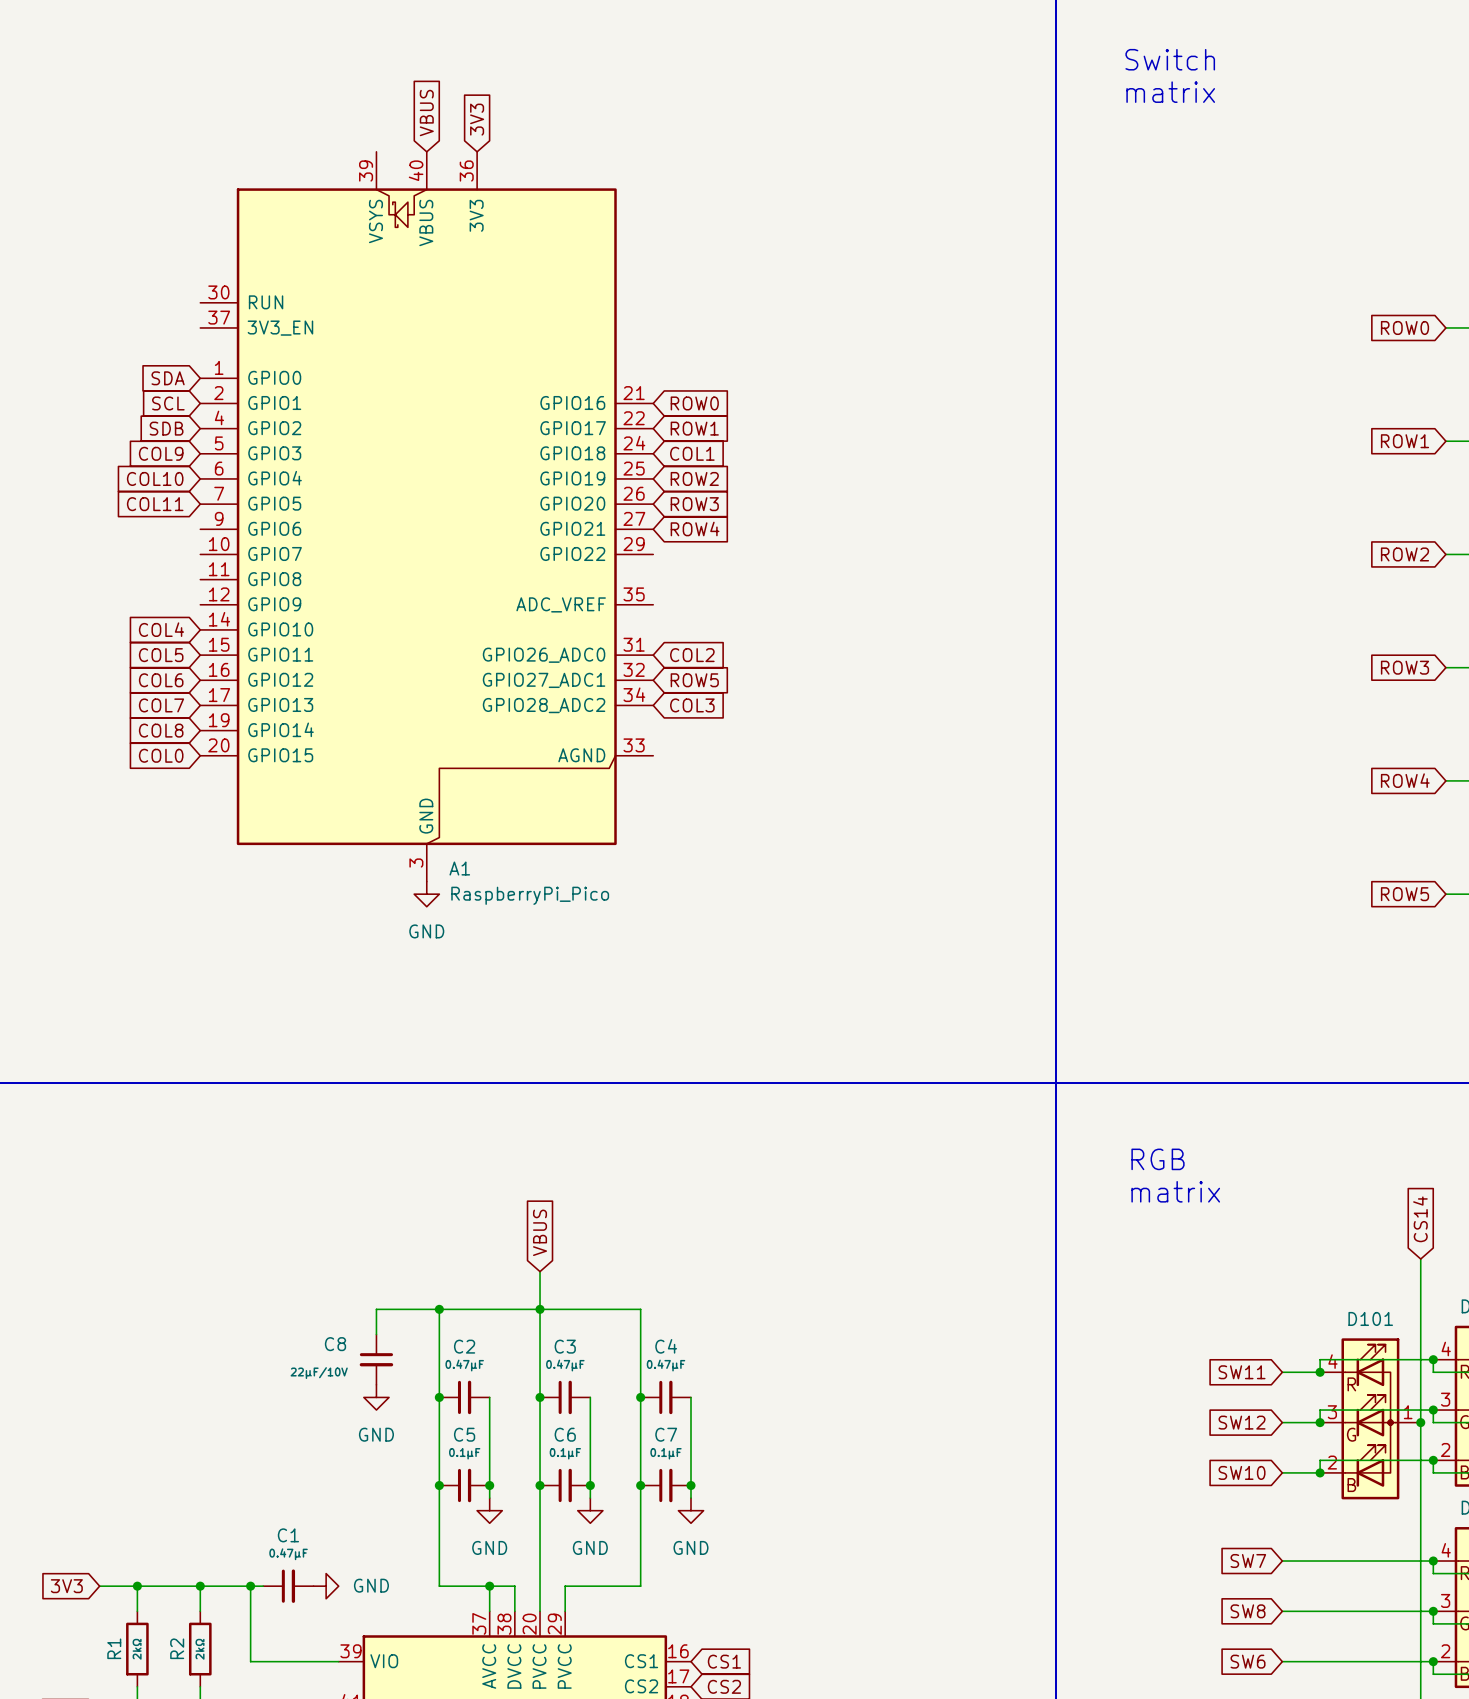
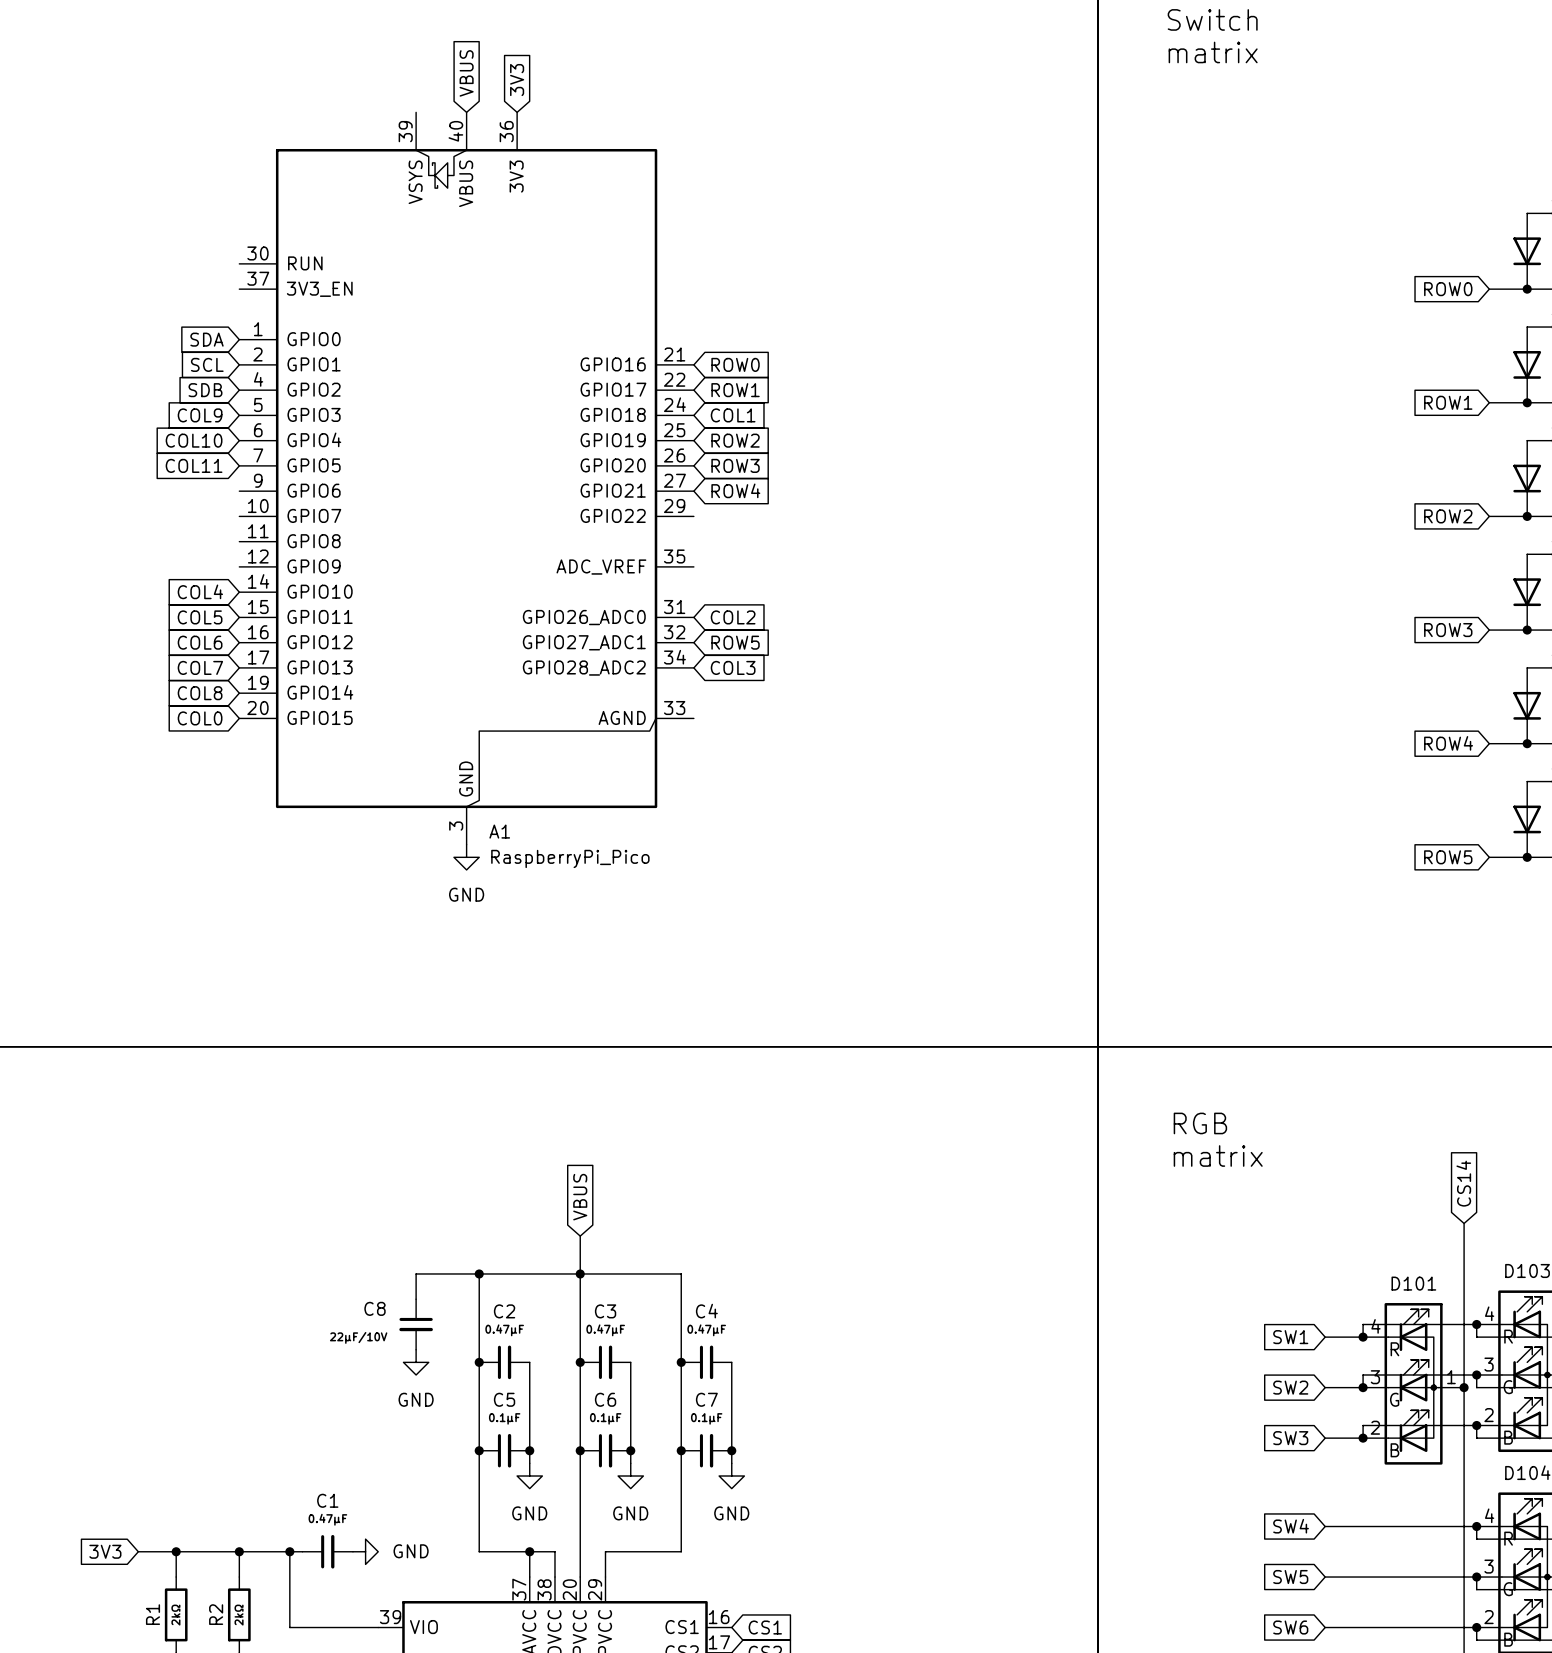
global label: SW11 (1242, 1372) -> SW1 (1290, 1337)
global label: SW12 (1242, 1422) -> SW2 (1290, 1387)
global label: SW10 (1242, 1472) -> SW3 (1290, 1438)
global label: SW7 (1248, 1561) -> SW4 (1291, 1526)
global label: SW8 (1248, 1611) -> SW5 (1290, 1577)

